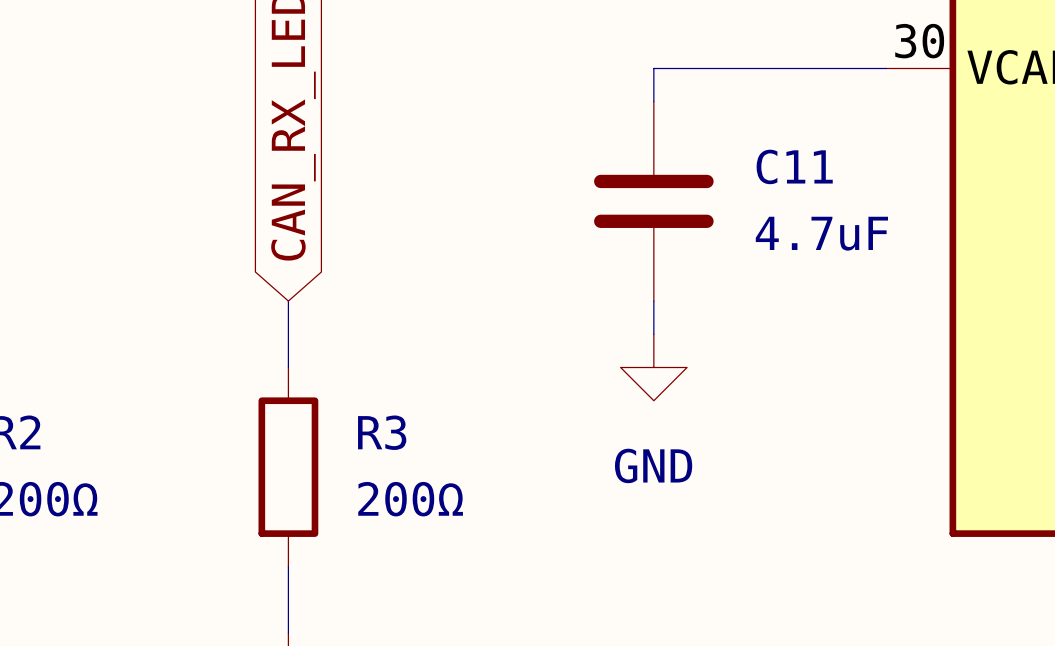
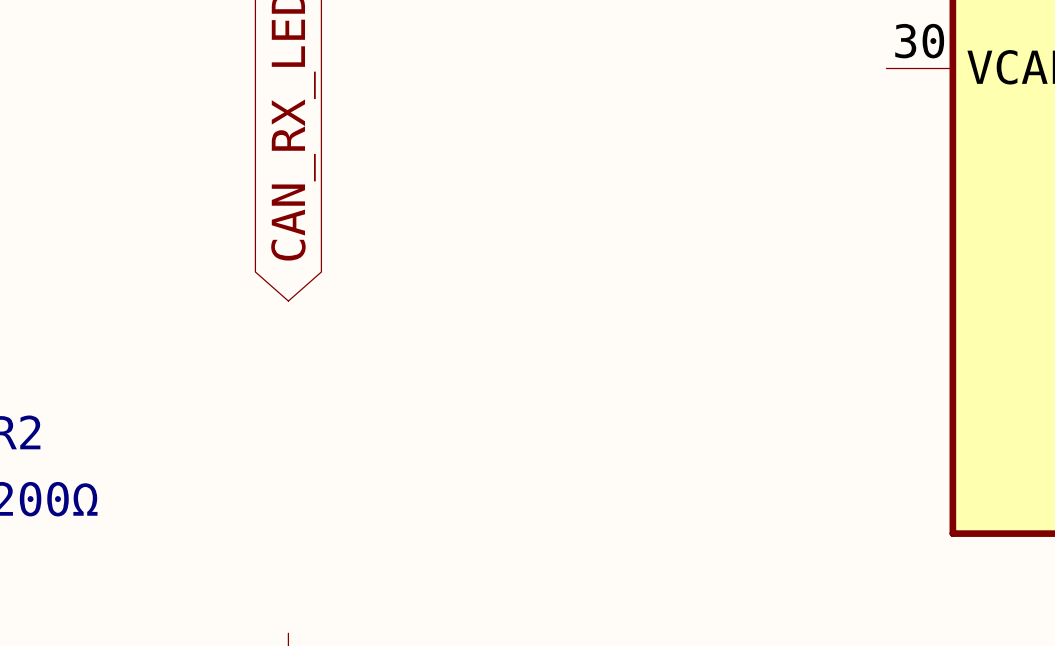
wire: (886, 68) (653, 68) (653, 101) -> none
C11: 4.7uF (653, 201) -> none
wire: (288, 301) (288, 367) -> none
wire: (653, 301) (653, 334) -> none
power symbol: GND (653, 367) -> none
R3: 200Ω (288, 467) -> none
wire: (288, 566) (288, 633) -> none

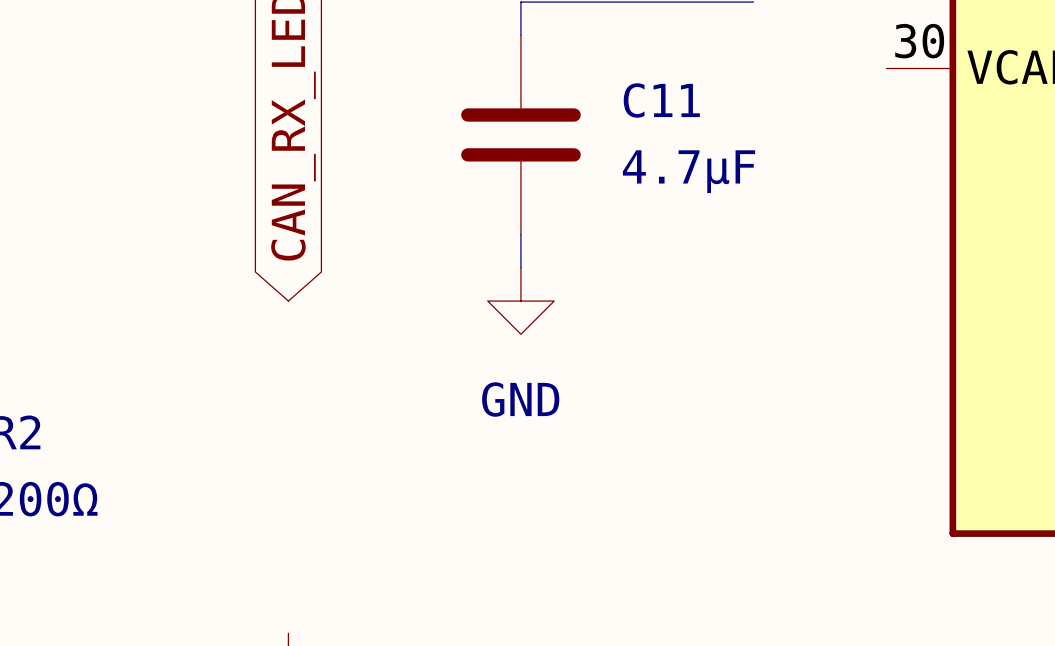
wire: none -> (753, 2) (520, 2) (520, 35)
C11: none -> 4.7μF (520, 134)
wire: none -> (520, 234) (520, 267)
power symbol: none -> GND (520, 301)

